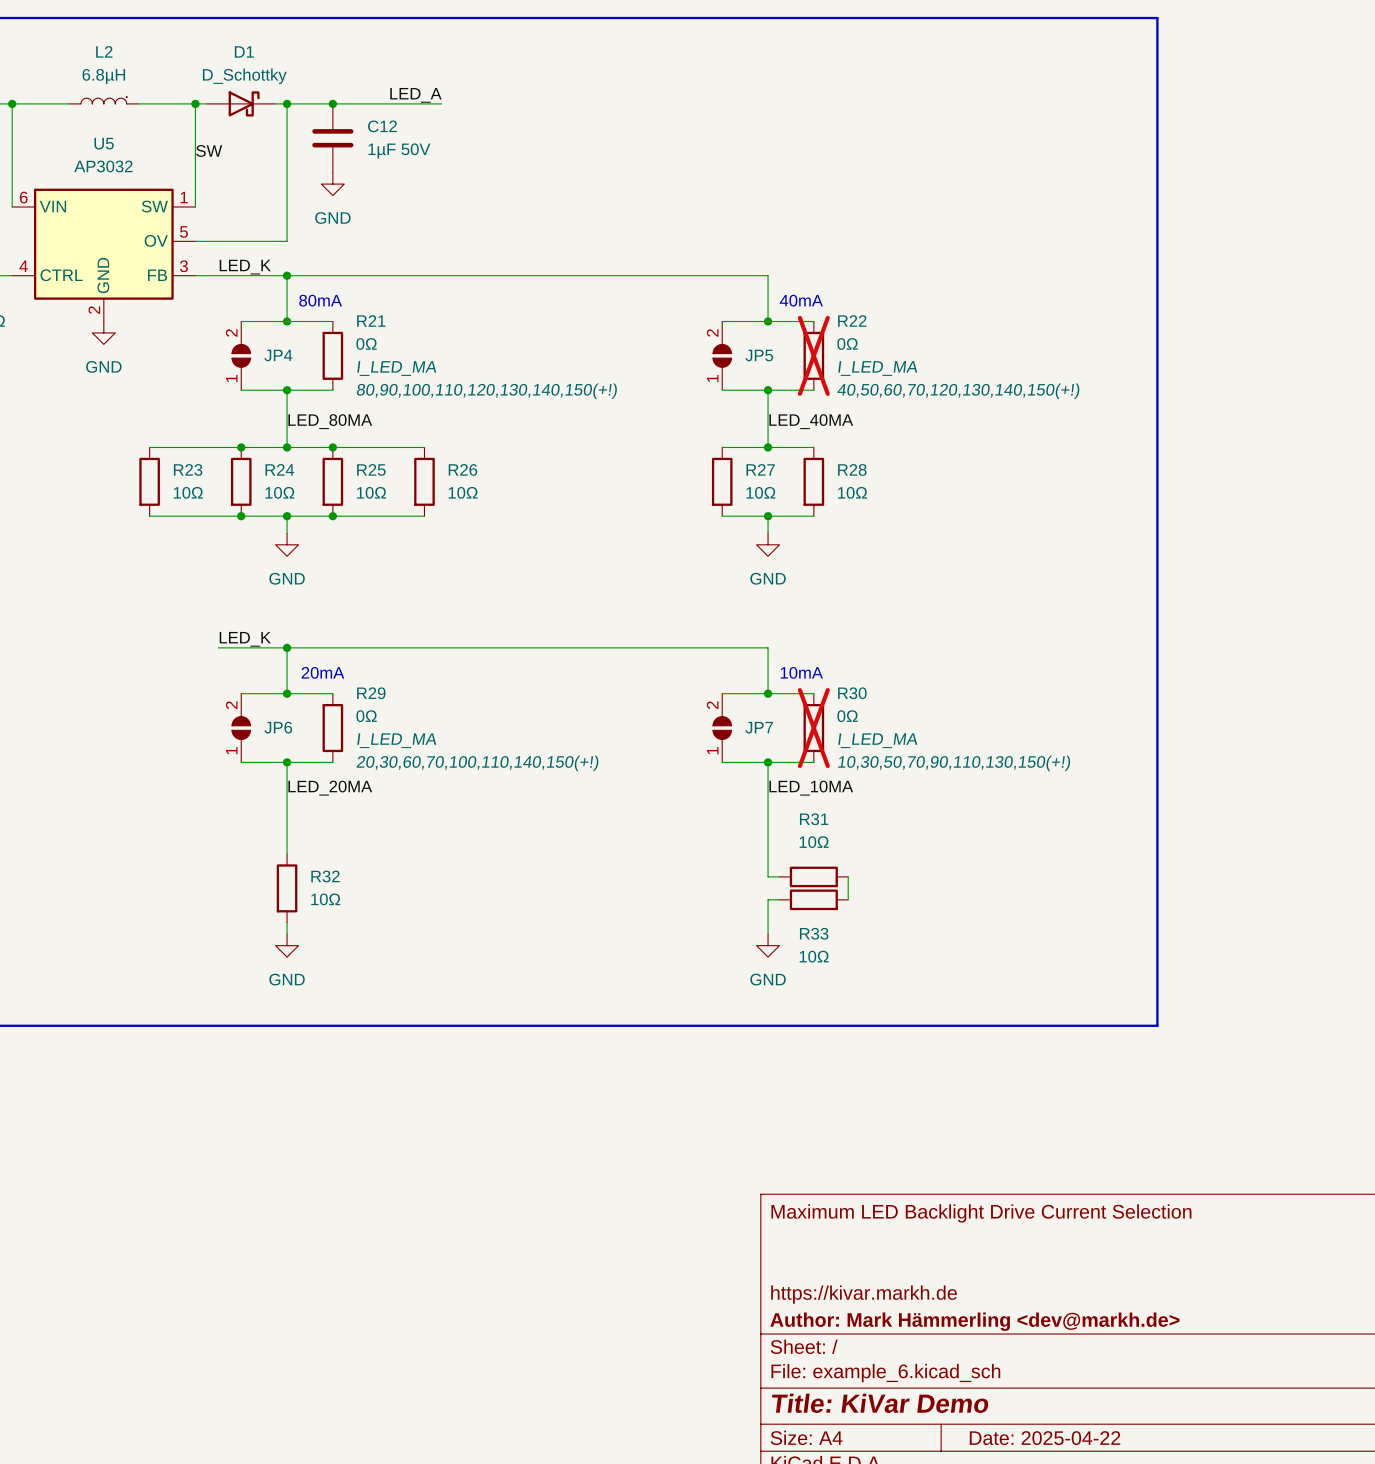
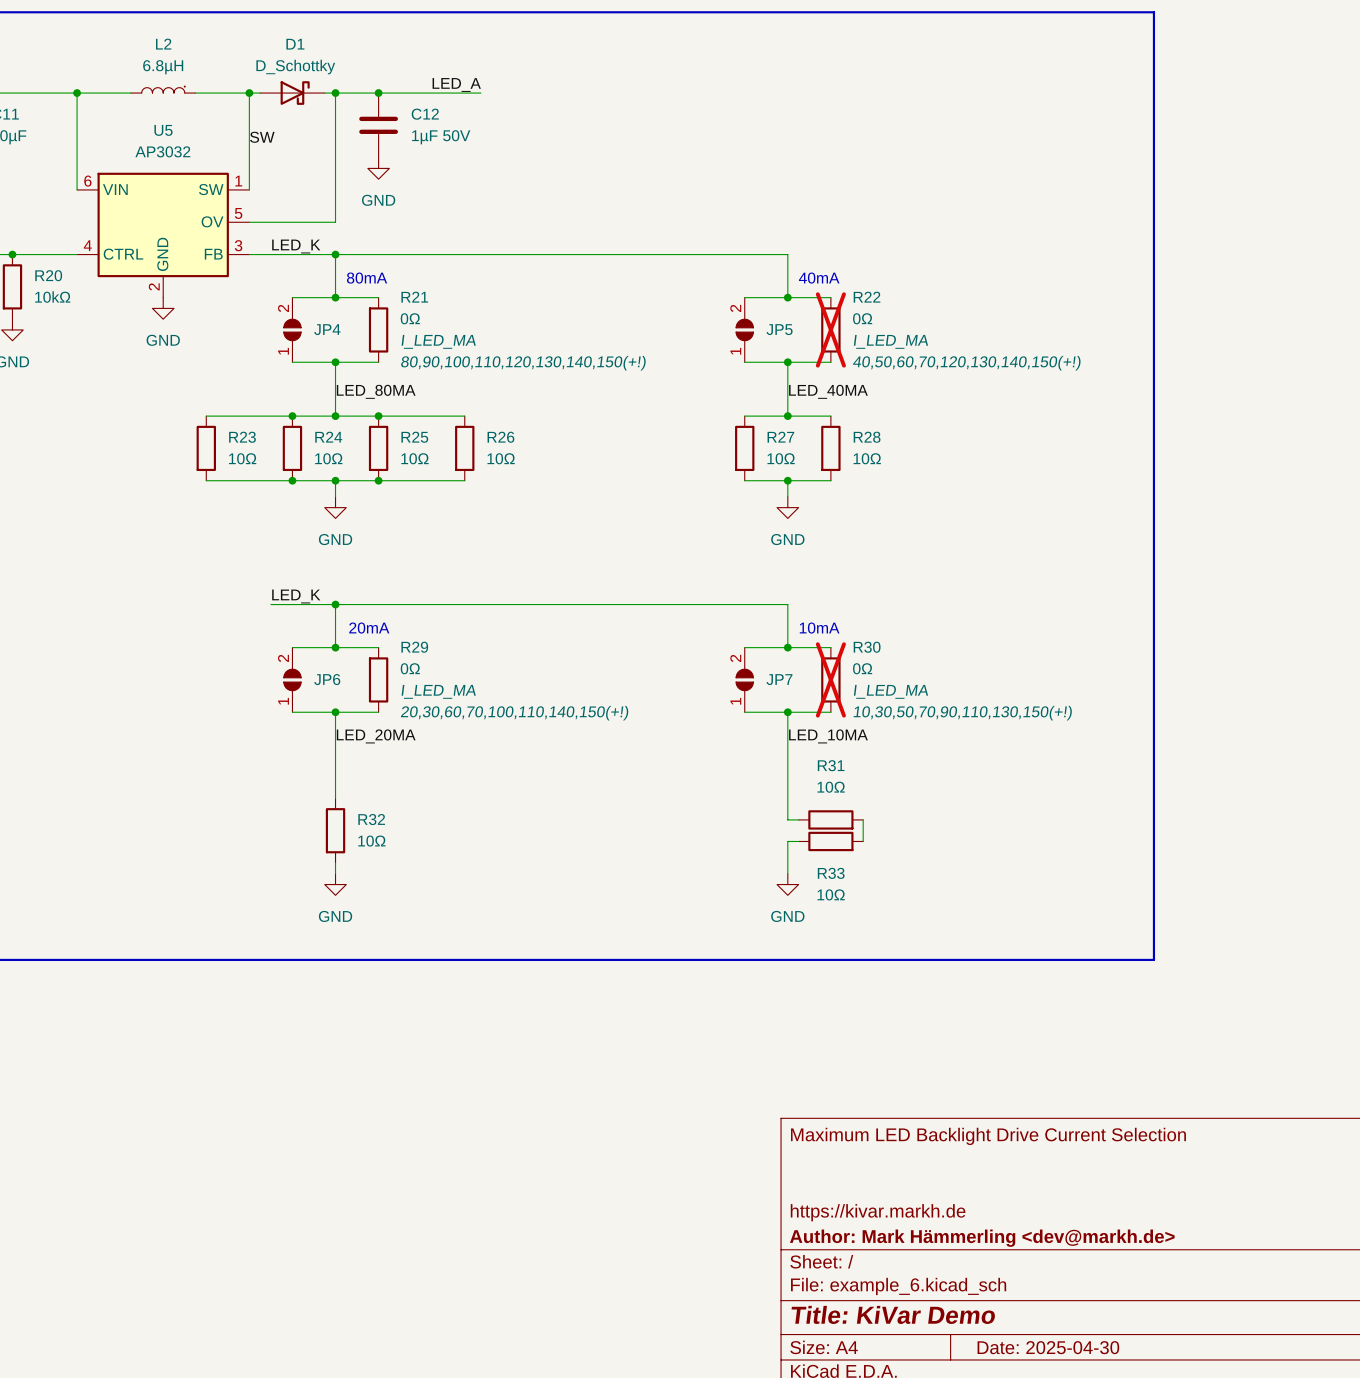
title block: Date: 2025-04-22 (1045, 1438) -> Date: 2025-04-30 (1048, 1347)

